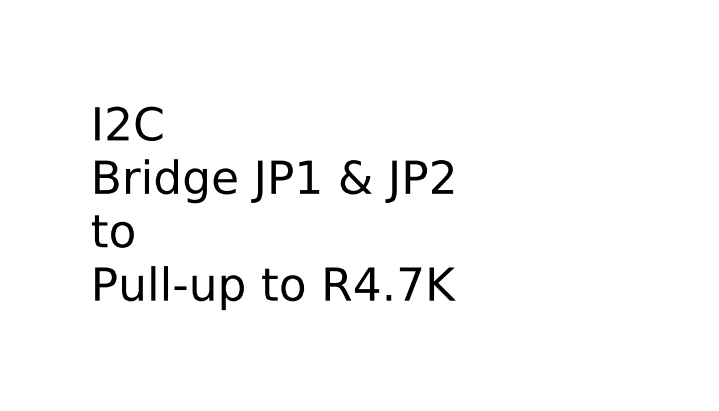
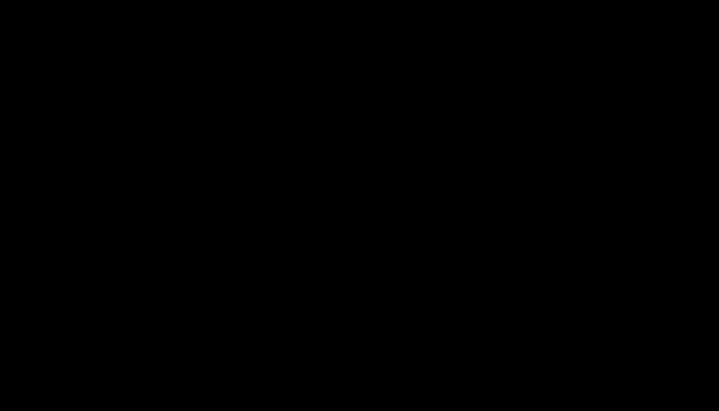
text: I2C (128, 123) -> none
text: Bridge JP1 & JP2 (274, 181) -> none
text: to (112, 231) -> none
text: Pull-up to R4.7K (275, 288) -> none

